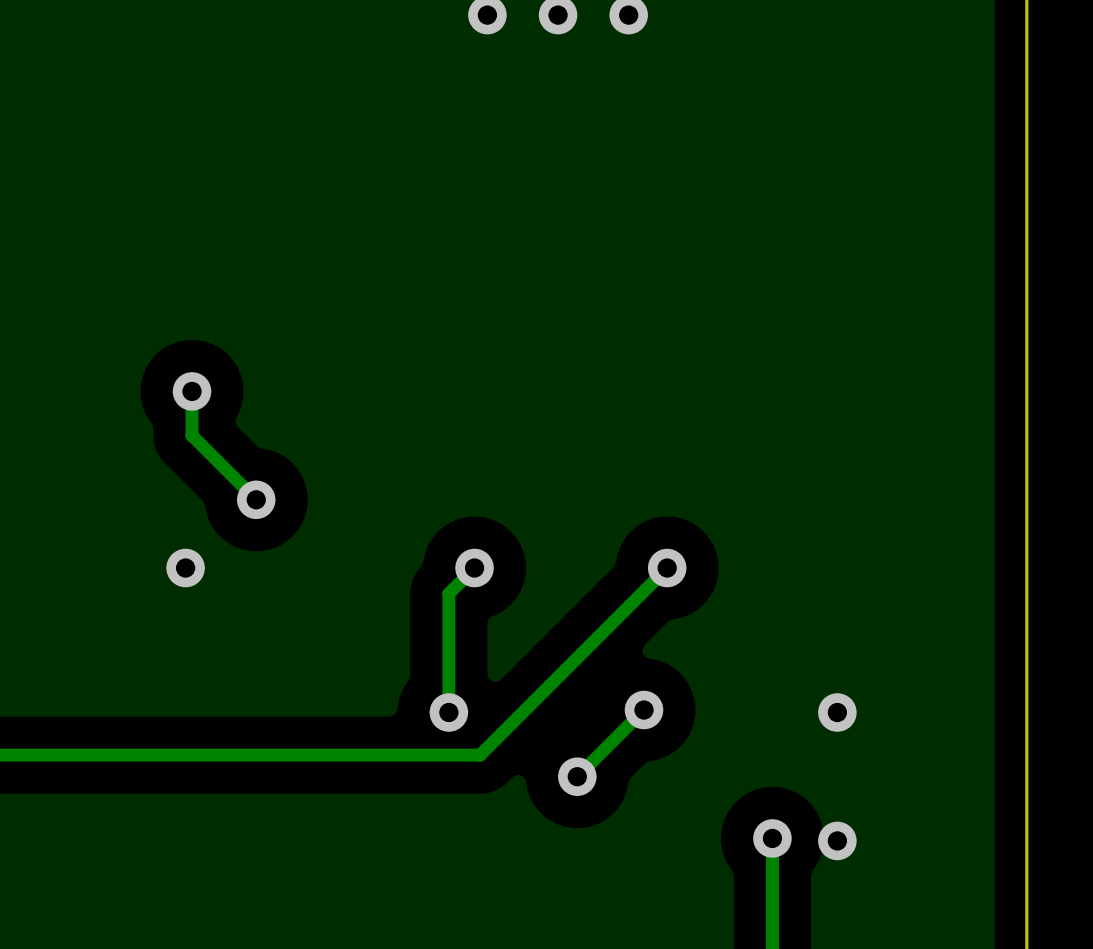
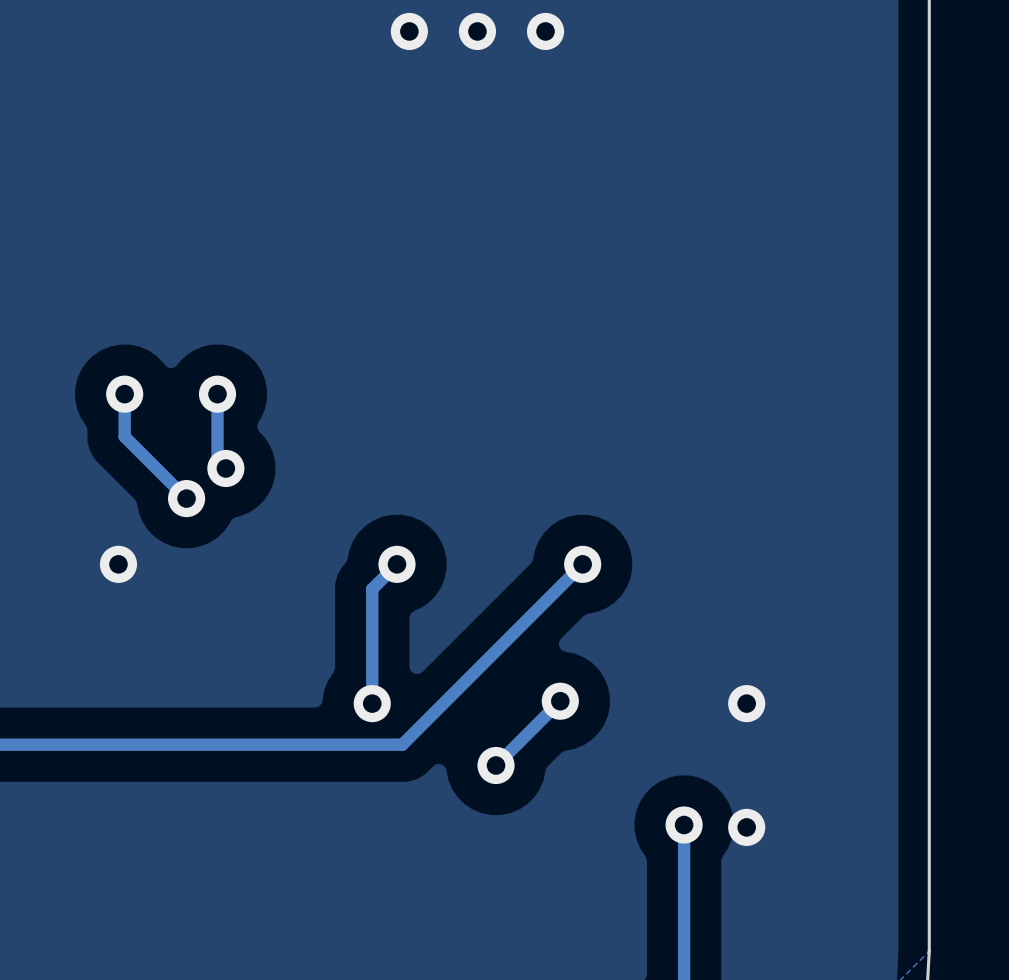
track: none -> (217, 394) (217, 460) (225, 468)
via: none -> (217, 394)
via: none -> (225, 468)

